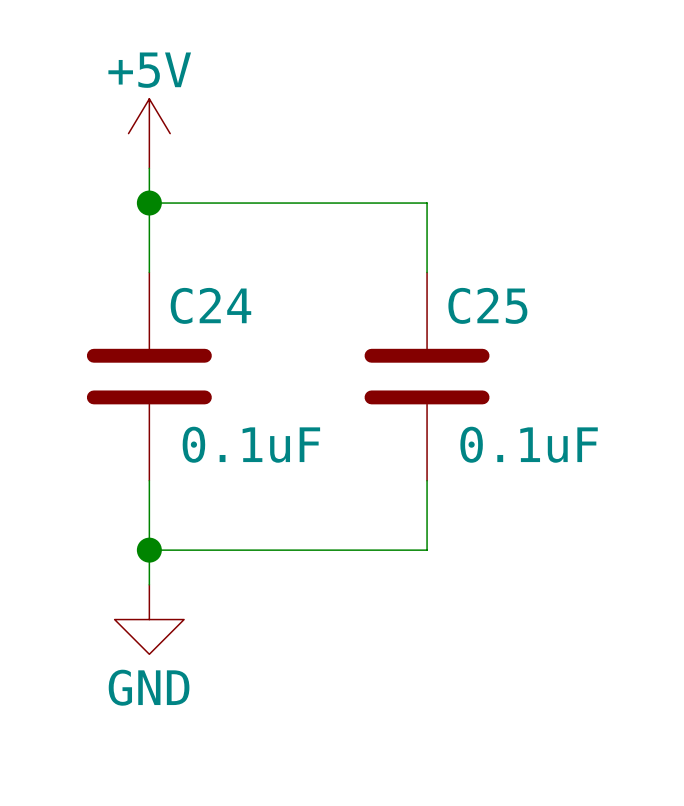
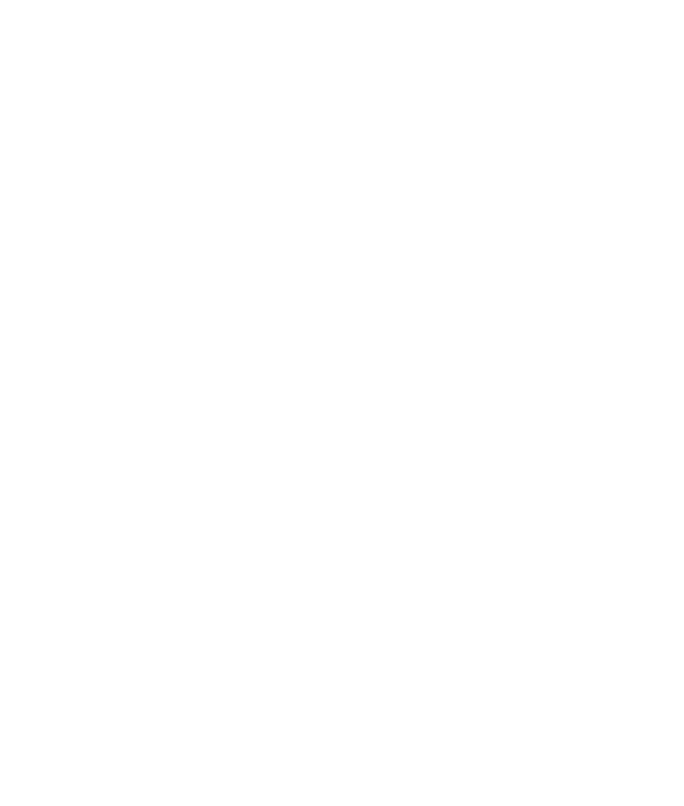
power symbol: +5V (149, 133) -> none
wire: (149, 168) (149, 272) -> none
wire: (149, 203) (427, 203) (427, 272) -> none
junction: (149, 203) -> none
C24: 0.1uF (149, 376) -> none
C25: 0.1uF (427, 376) -> none
wire: (149, 480) (149, 584) -> none
wire: (427, 480) (427, 550) (149, 550) -> none
junction: (149, 550) -> none
power symbol: GND (149, 619) -> none

